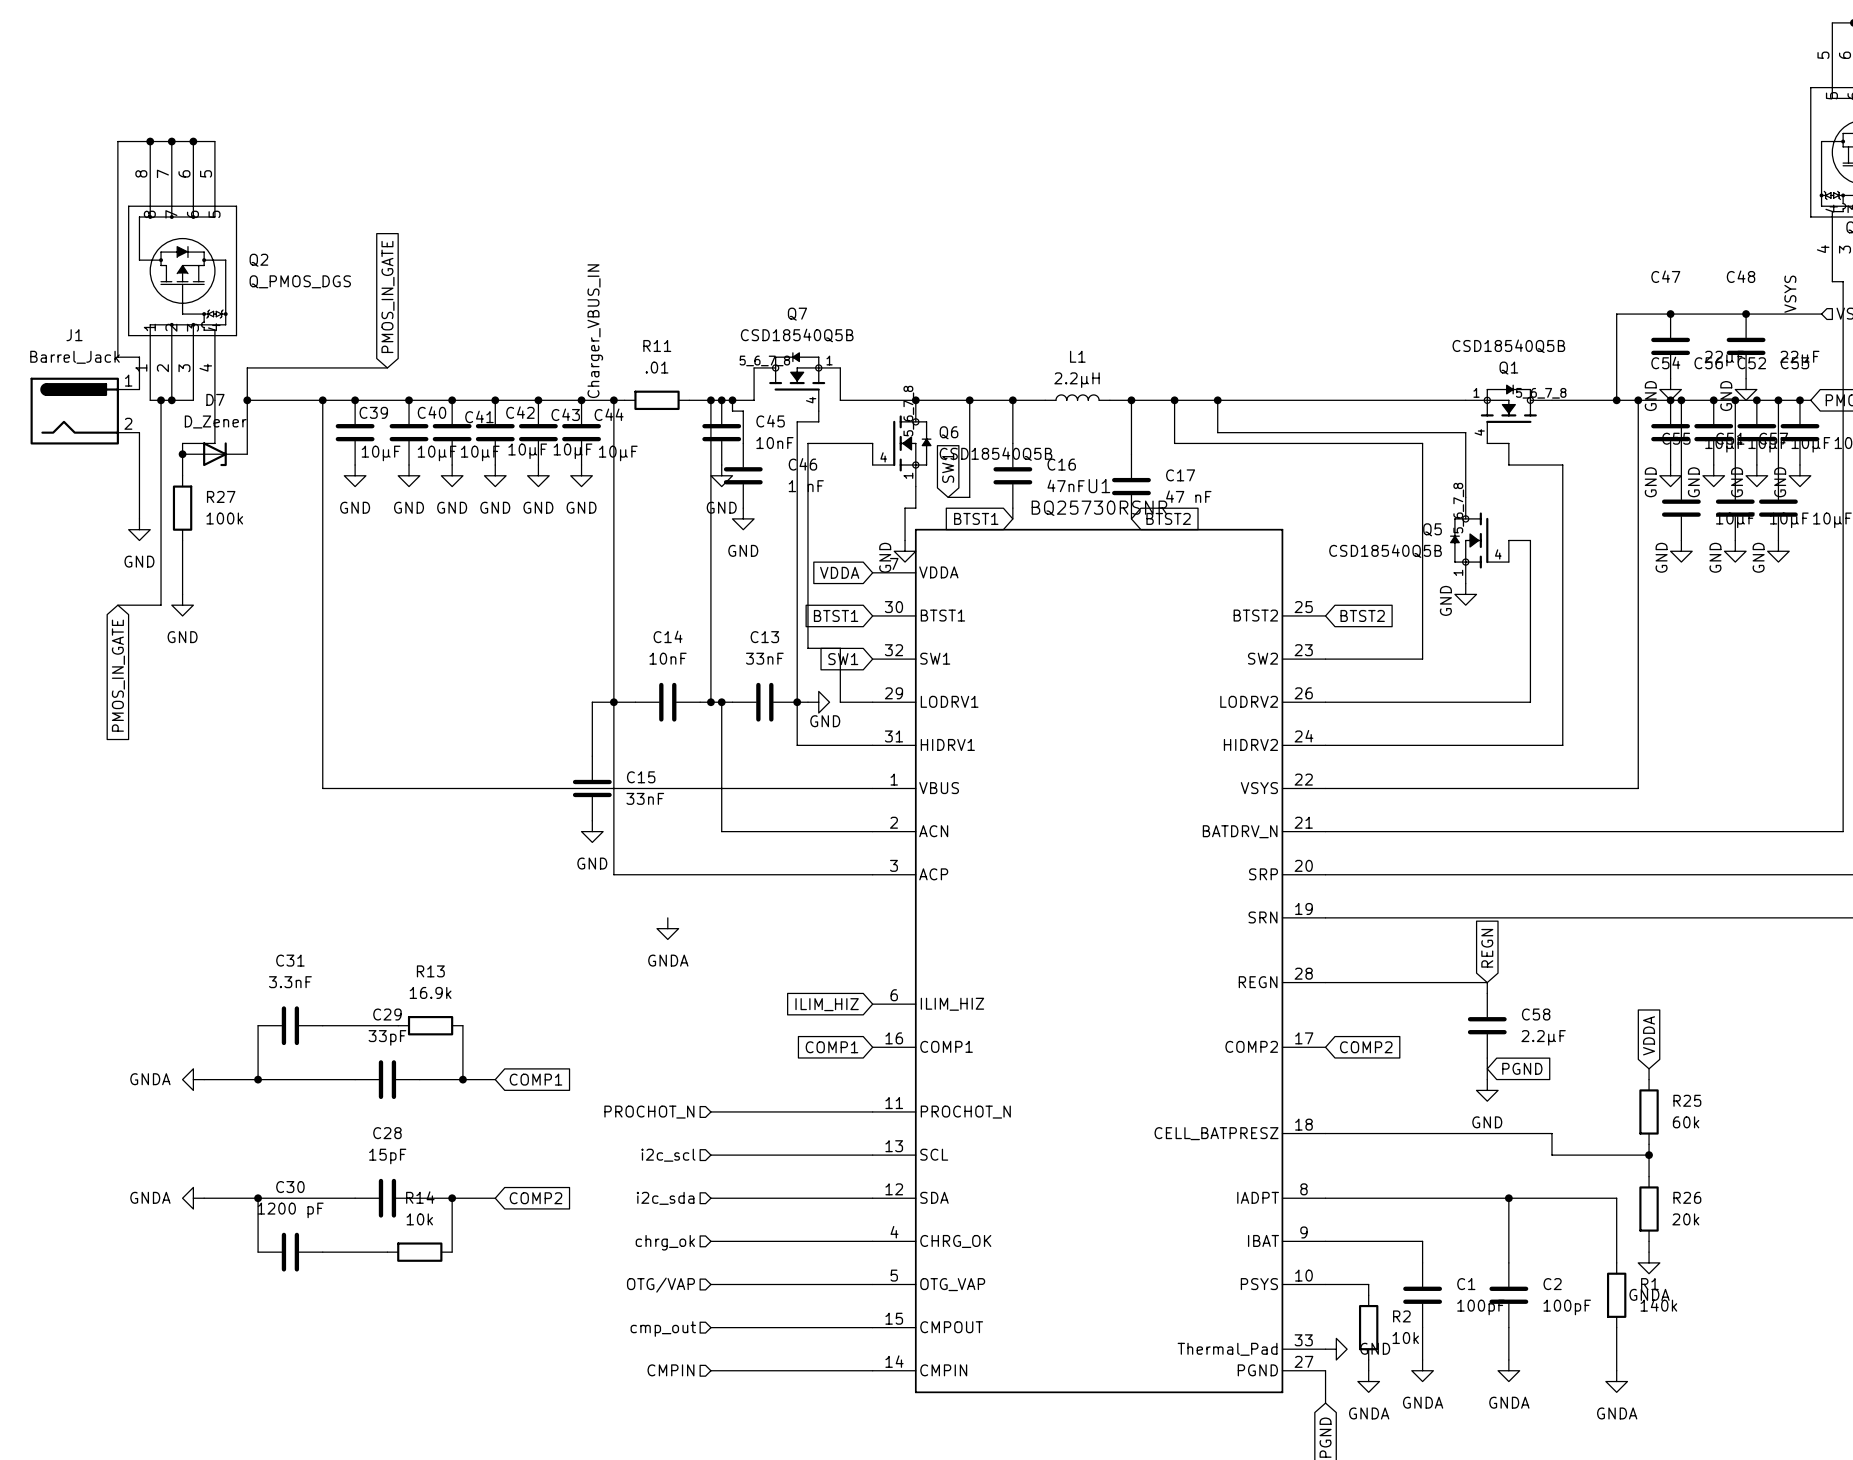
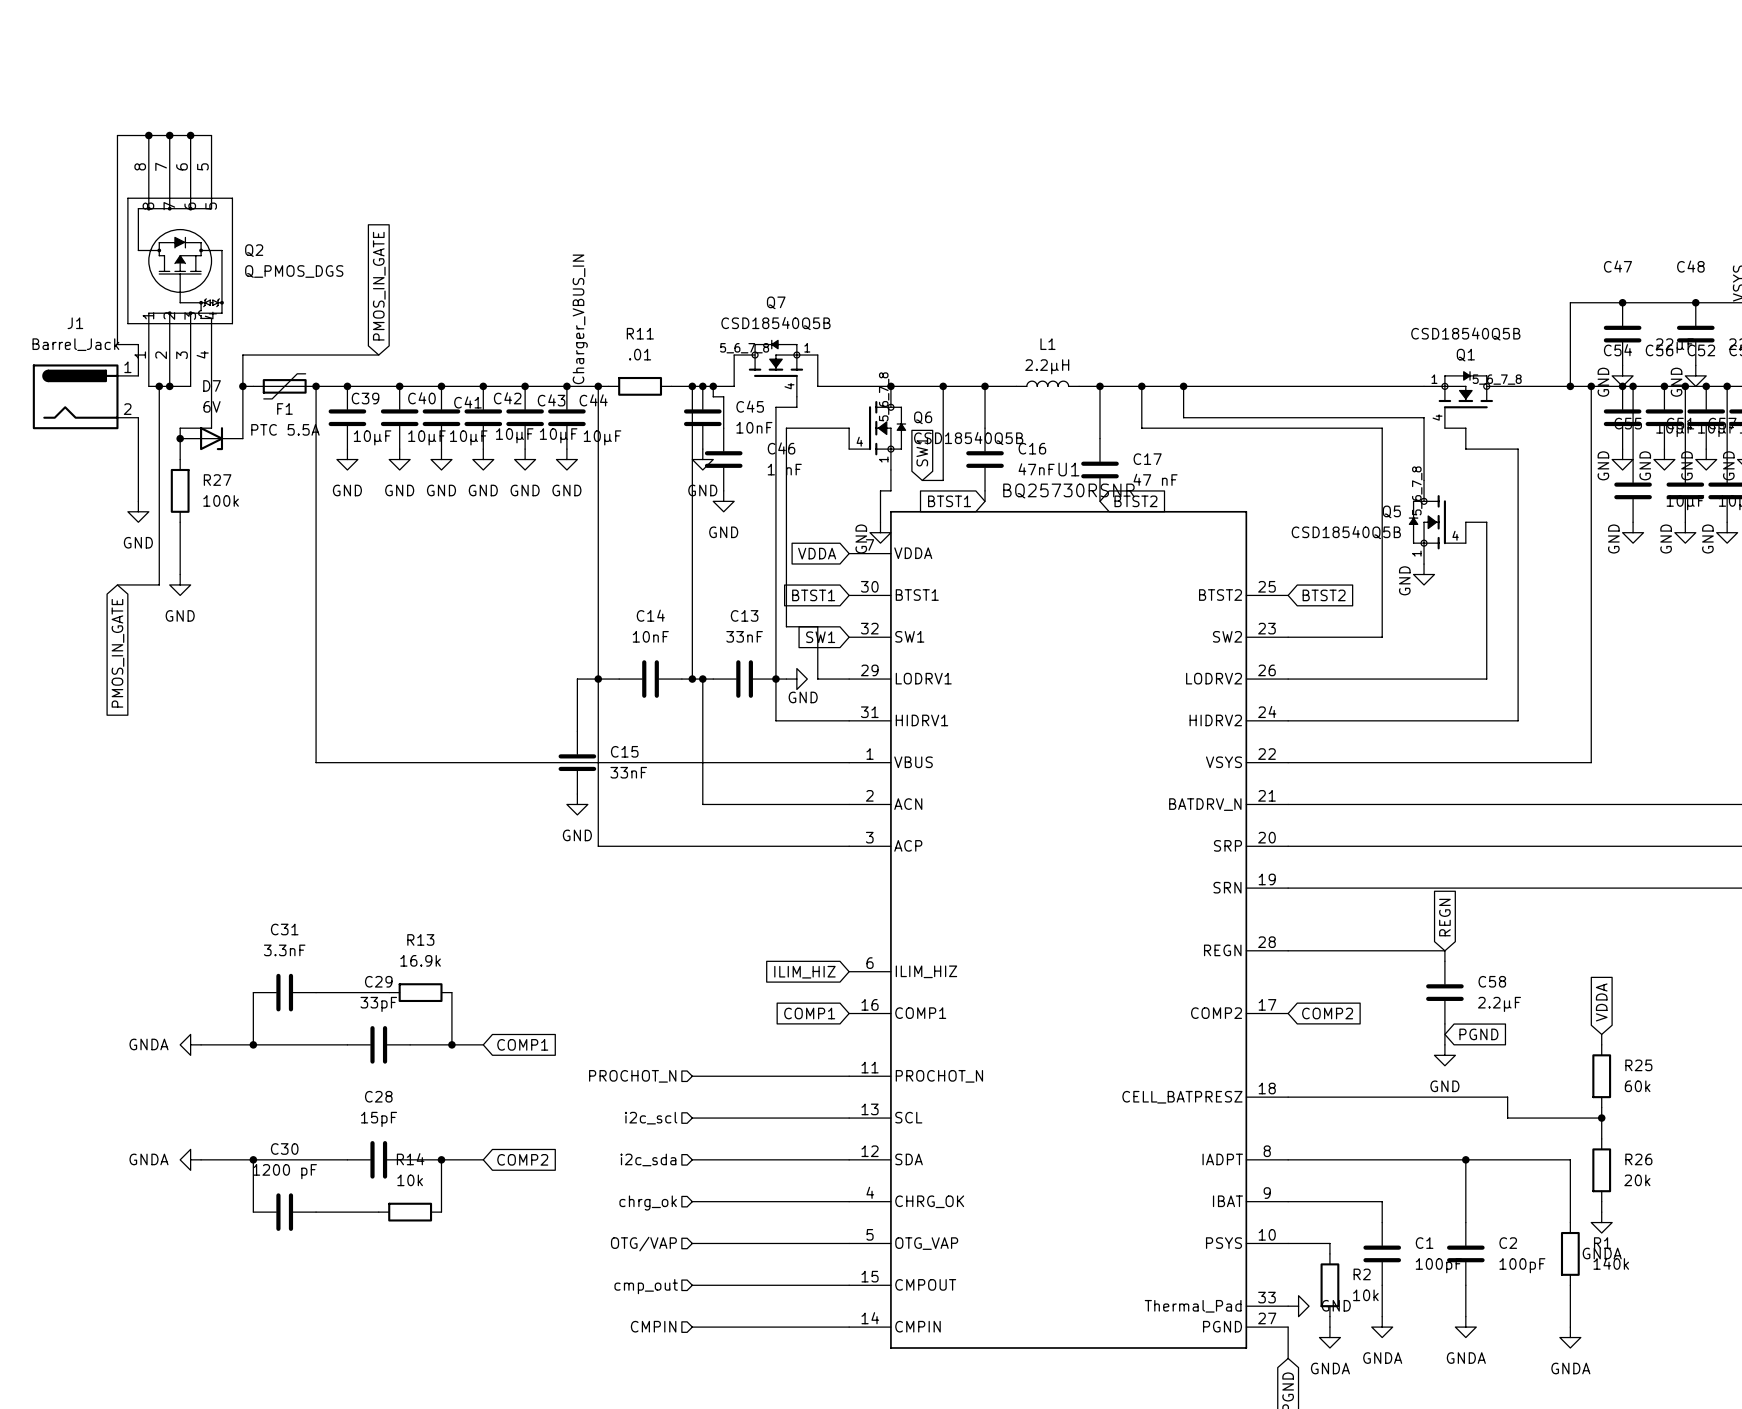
F1: none -> PTC 5.5A (284, 386)
D7 value: D_Zener (215, 421) -> 6V (212, 406)
power symbol: GNDA (667, 928) -> none

